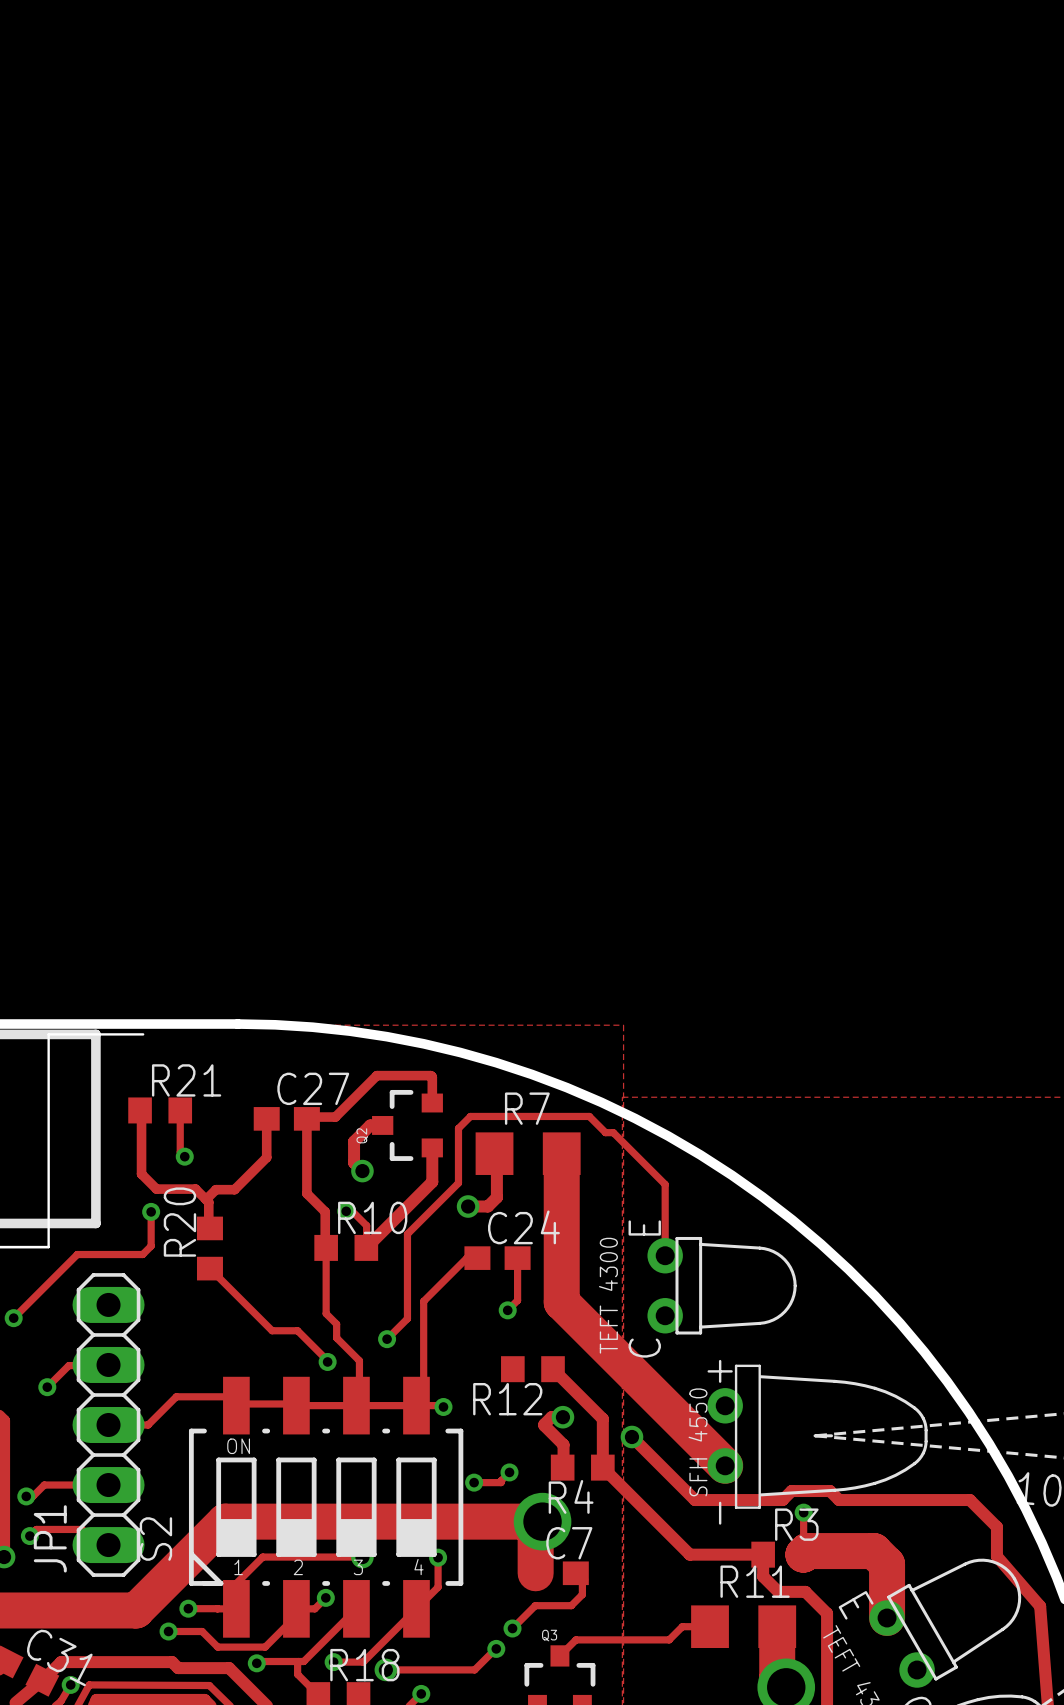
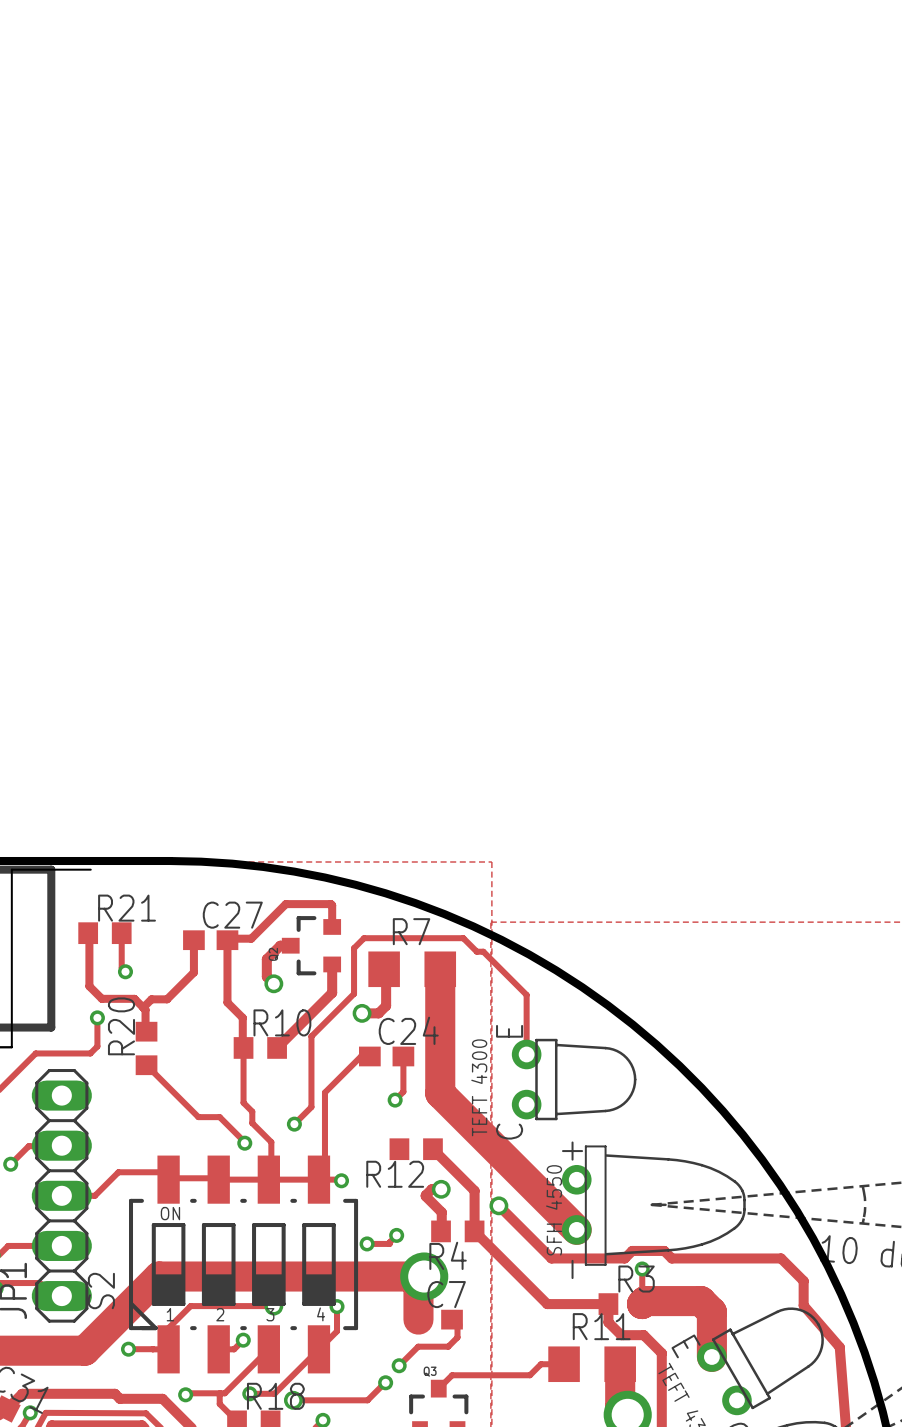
track: (346, 1211) (352, 1211) (366, 1225) (366, 1247) -> none
via: (346, 1211) -> none
track: (296, 1608) (296, 1615) (265, 1647) (217, 1647) (202, 1631) (168, 1631) -> none
via: (168, 1631) -> none

